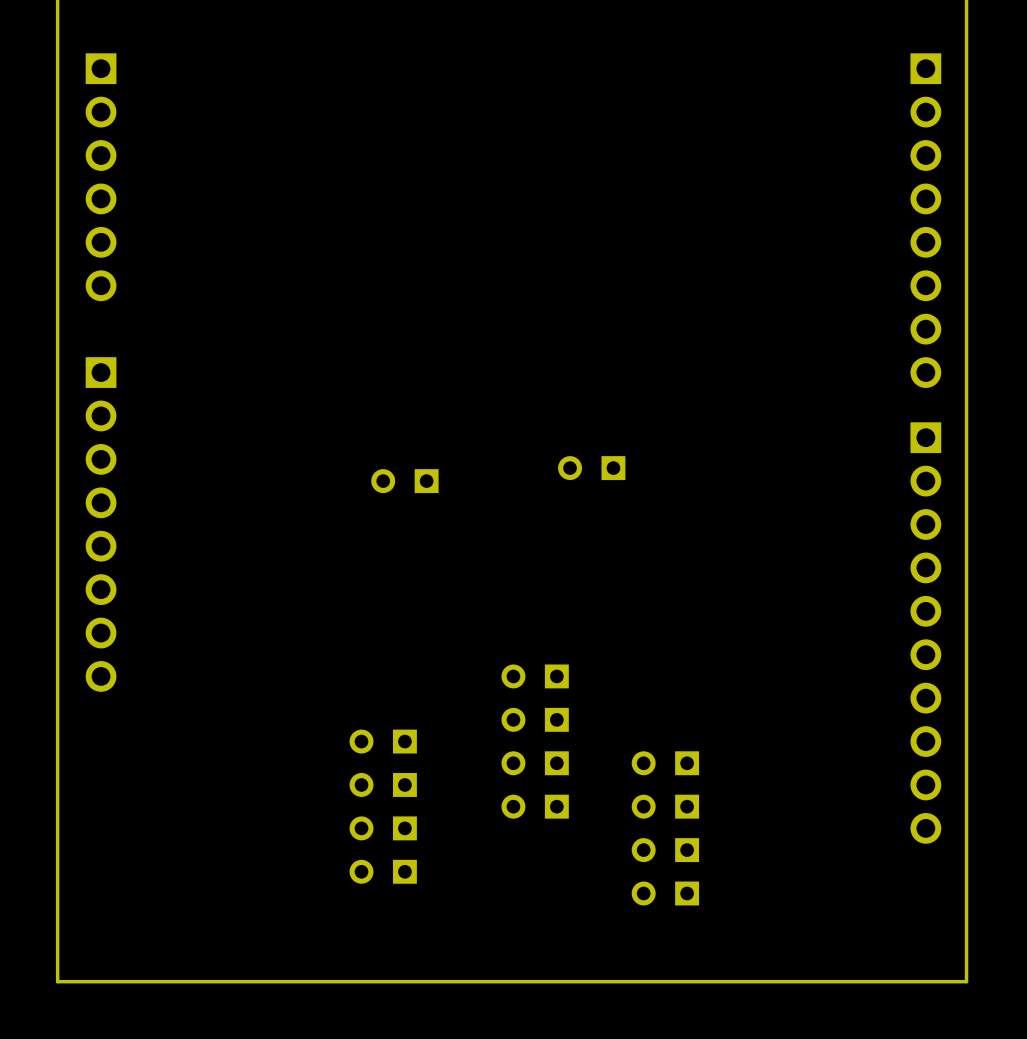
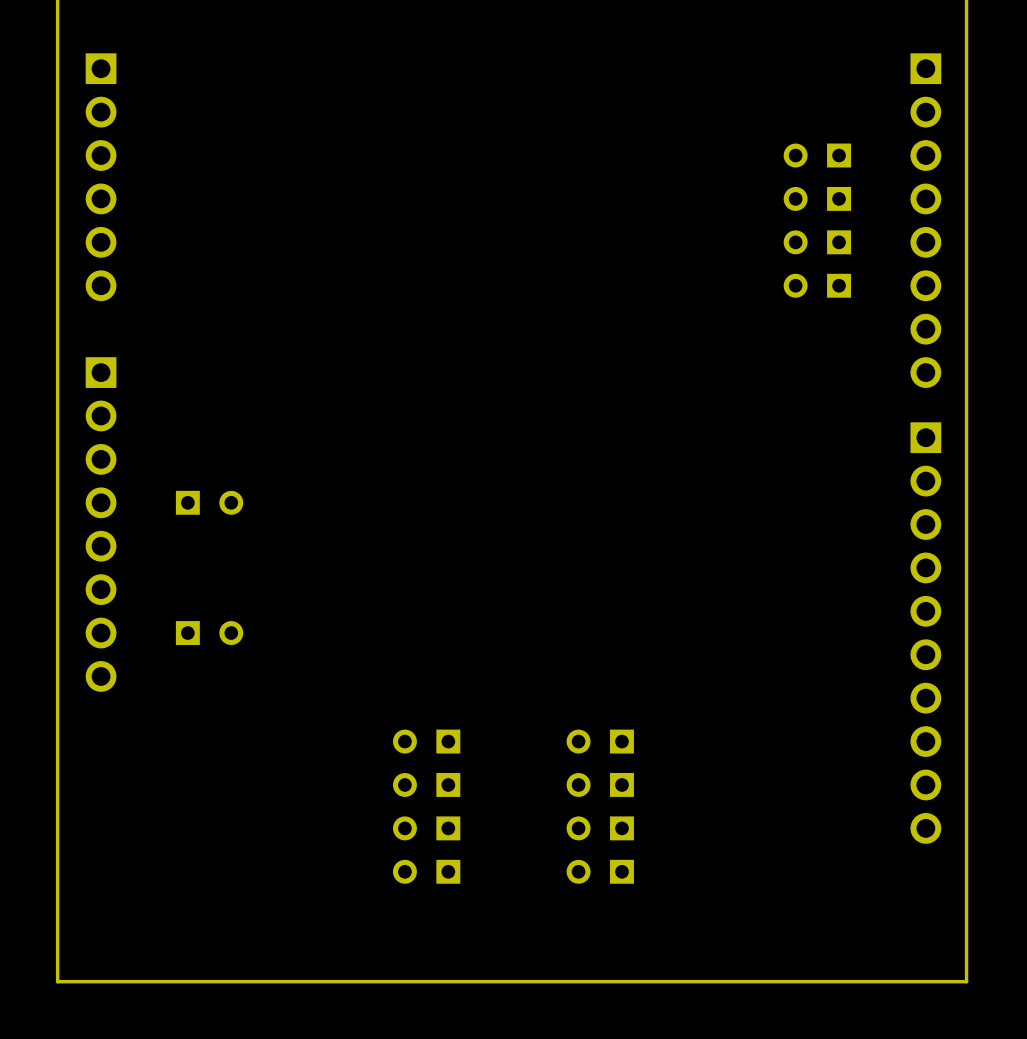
part: none -> (817, 155)
part: none -> (817, 198)
part: none -> (817, 242)
part: none -> (817, 285)
part: (591, 468) -> none
part: (404, 481) -> none
part: none -> (209, 502)
part: none -> (209, 633)
part: (535, 676) -> none
part: (535, 719) -> none
part: (383, 741) -> none
part: none -> (426, 741)
part: none -> (600, 741)
part: (535, 763) -> none
part: (665, 763) -> none
part: (383, 784) -> none
part: none -> (426, 784)
part: none -> (600, 784)
part: (535, 806) -> none
part: (665, 806) -> none
part: (383, 828) -> none
part: none -> (426, 828)
part: none -> (600, 828)
part: (665, 850) -> none
part: (383, 871) -> none
part: none -> (426, 871)
part: none -> (600, 871)
part: (665, 893) -> none

